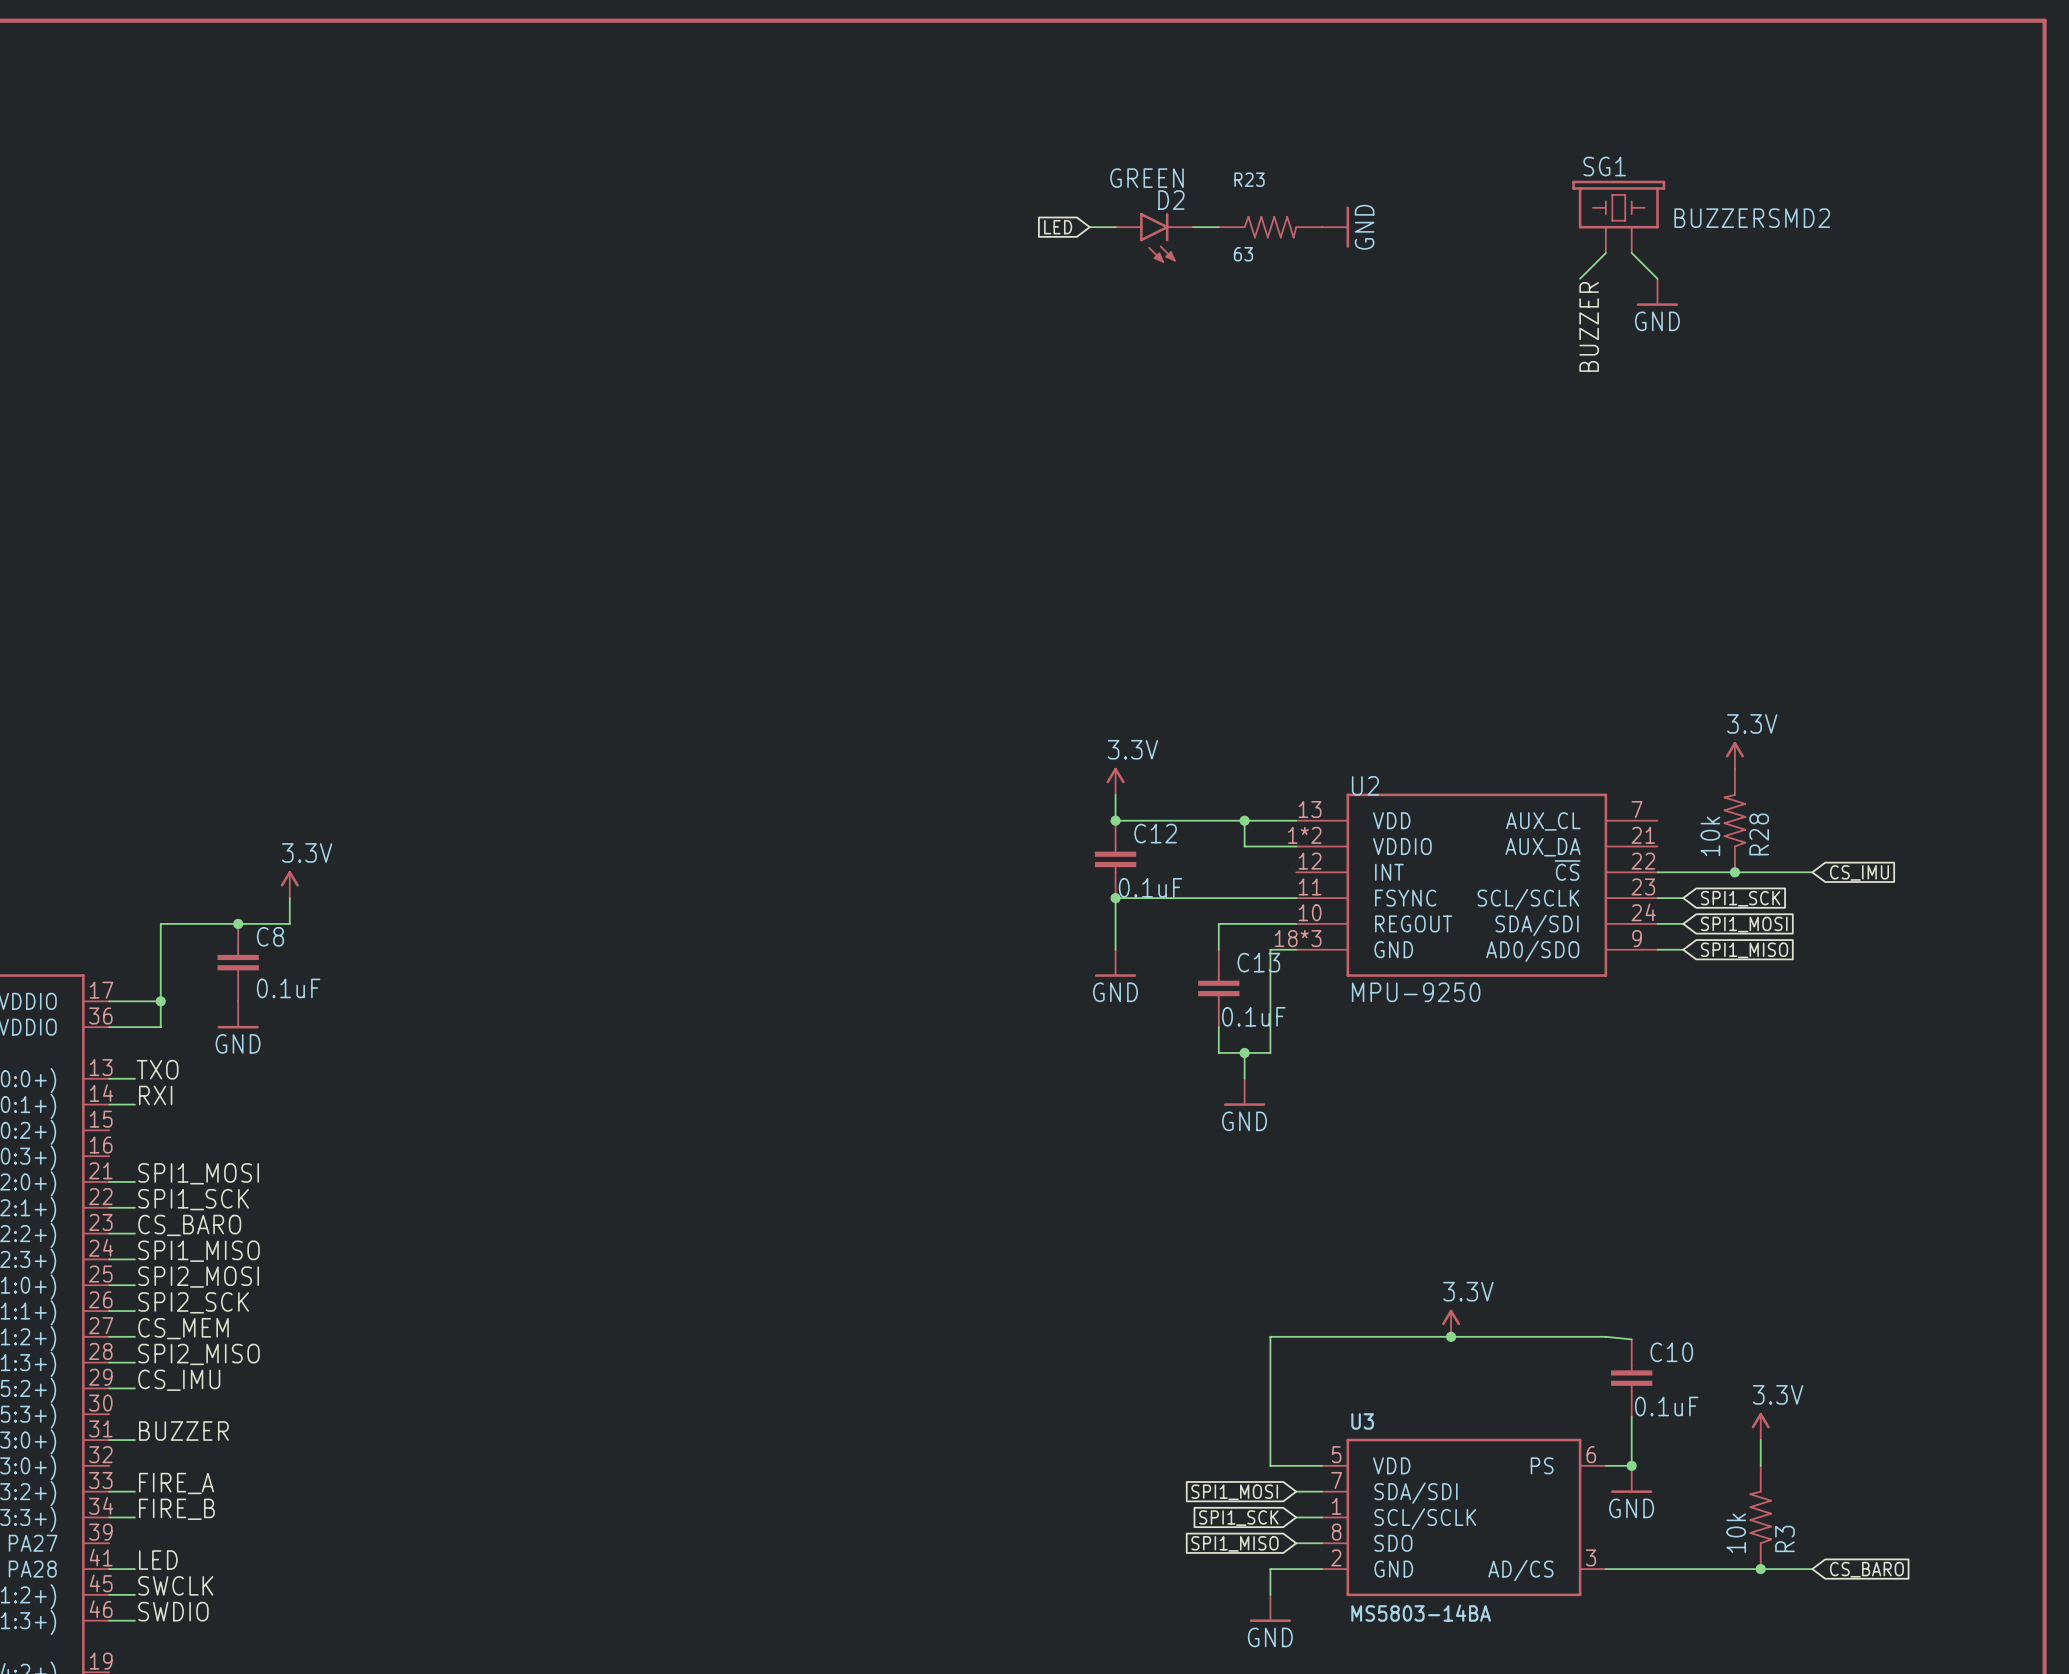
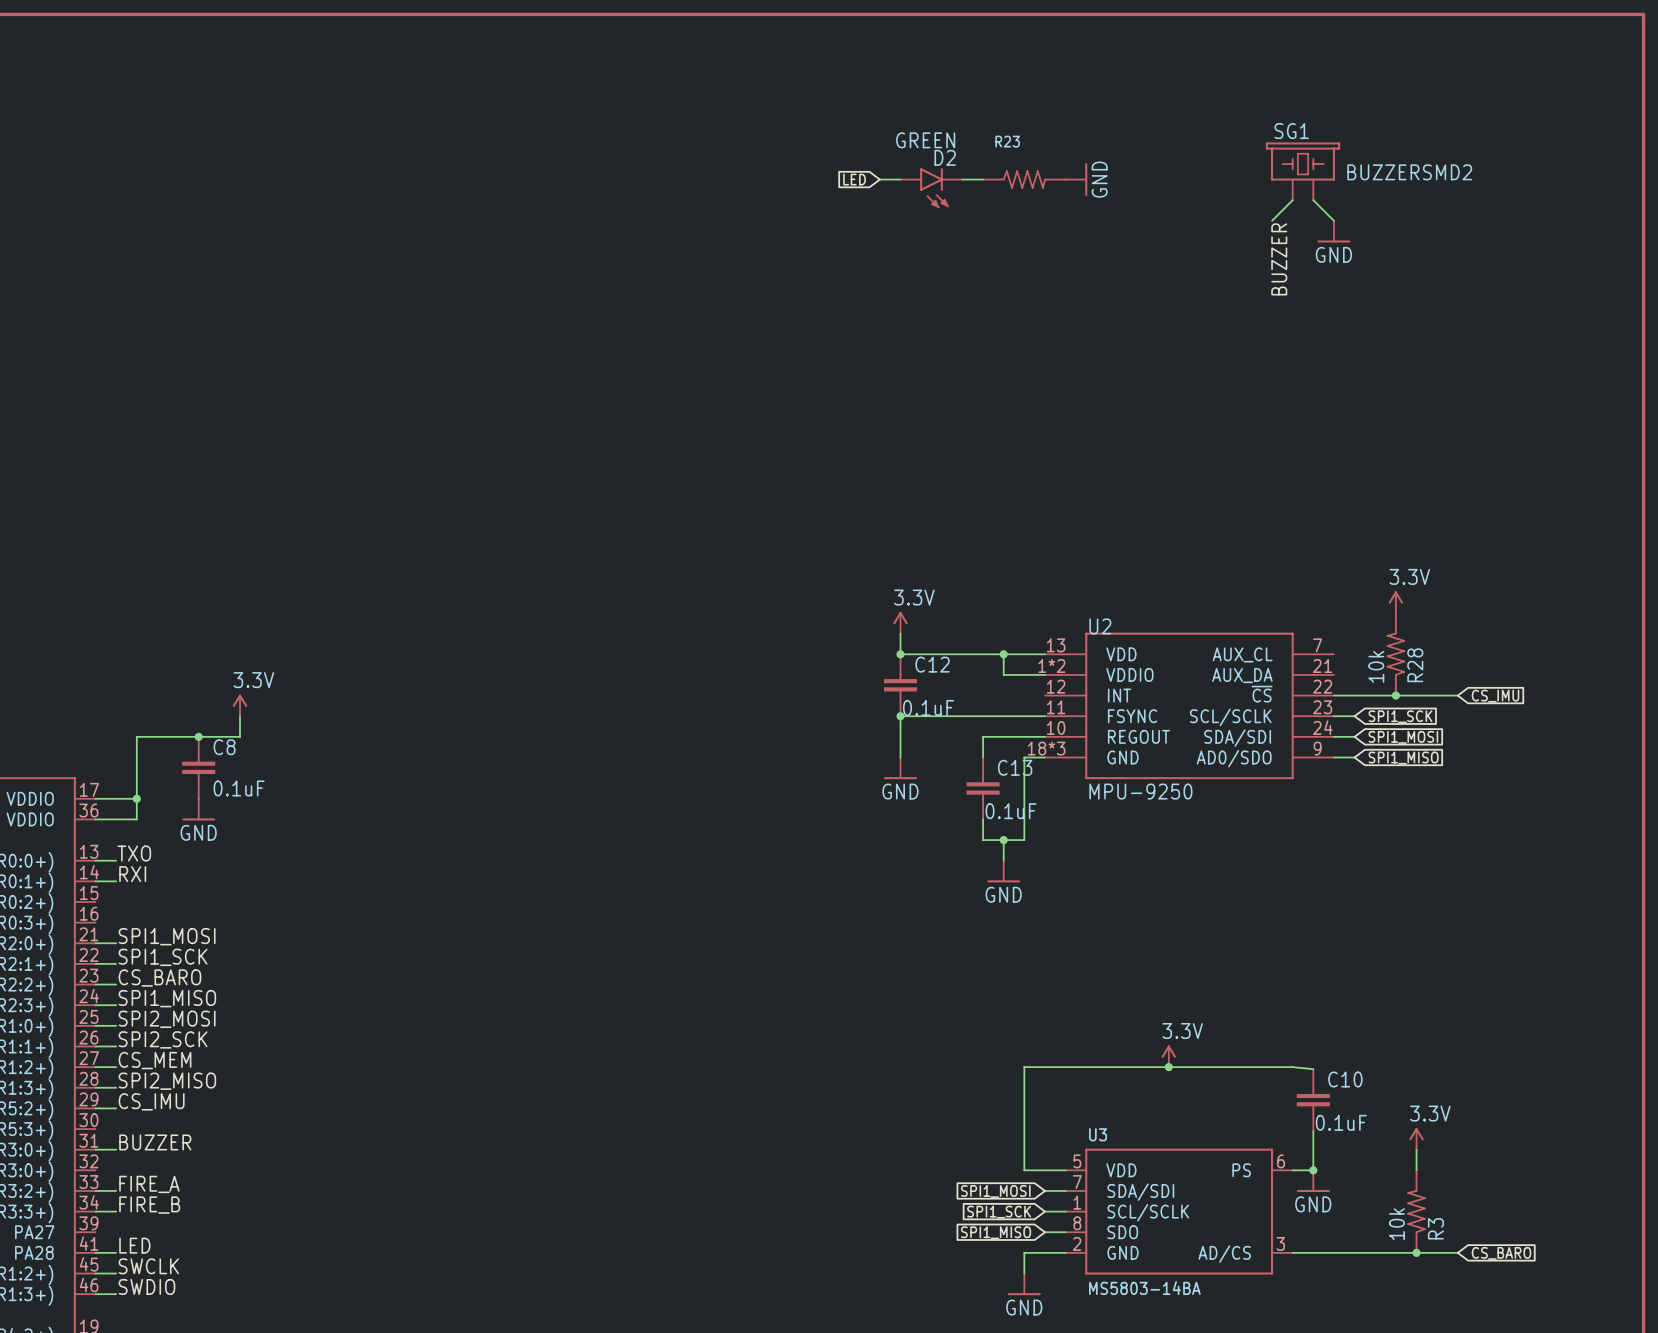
R23 value: 63 (1243, 254) -> none

